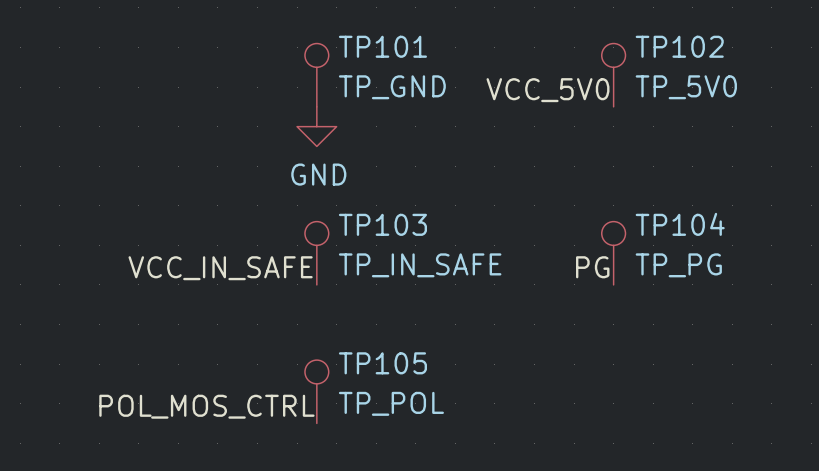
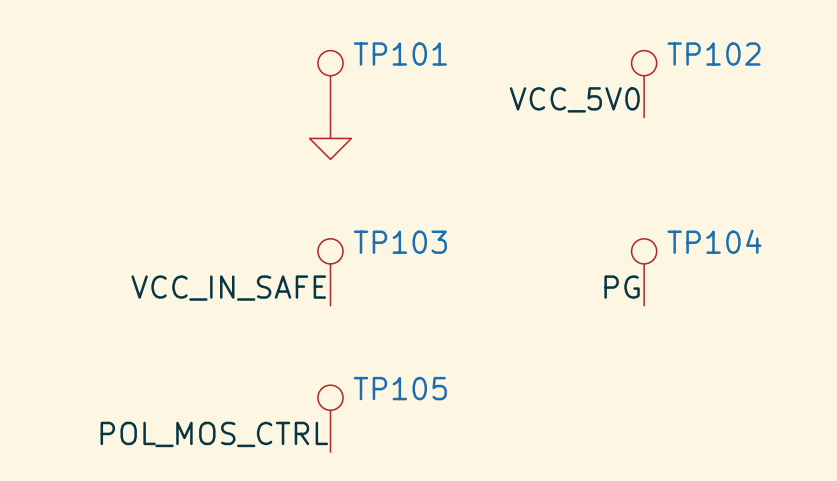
TP101 value: TP_GND (392, 87) -> none
TP102 value: TP_5V0 (686, 87) -> none
power symbol text: GND (318, 174) -> none
TP103 value: TP_IN_SAFE (420, 265) -> none
TP104 value: TP_PG (678, 265) -> none
TP105 value: TP_POL (391, 403) -> none

